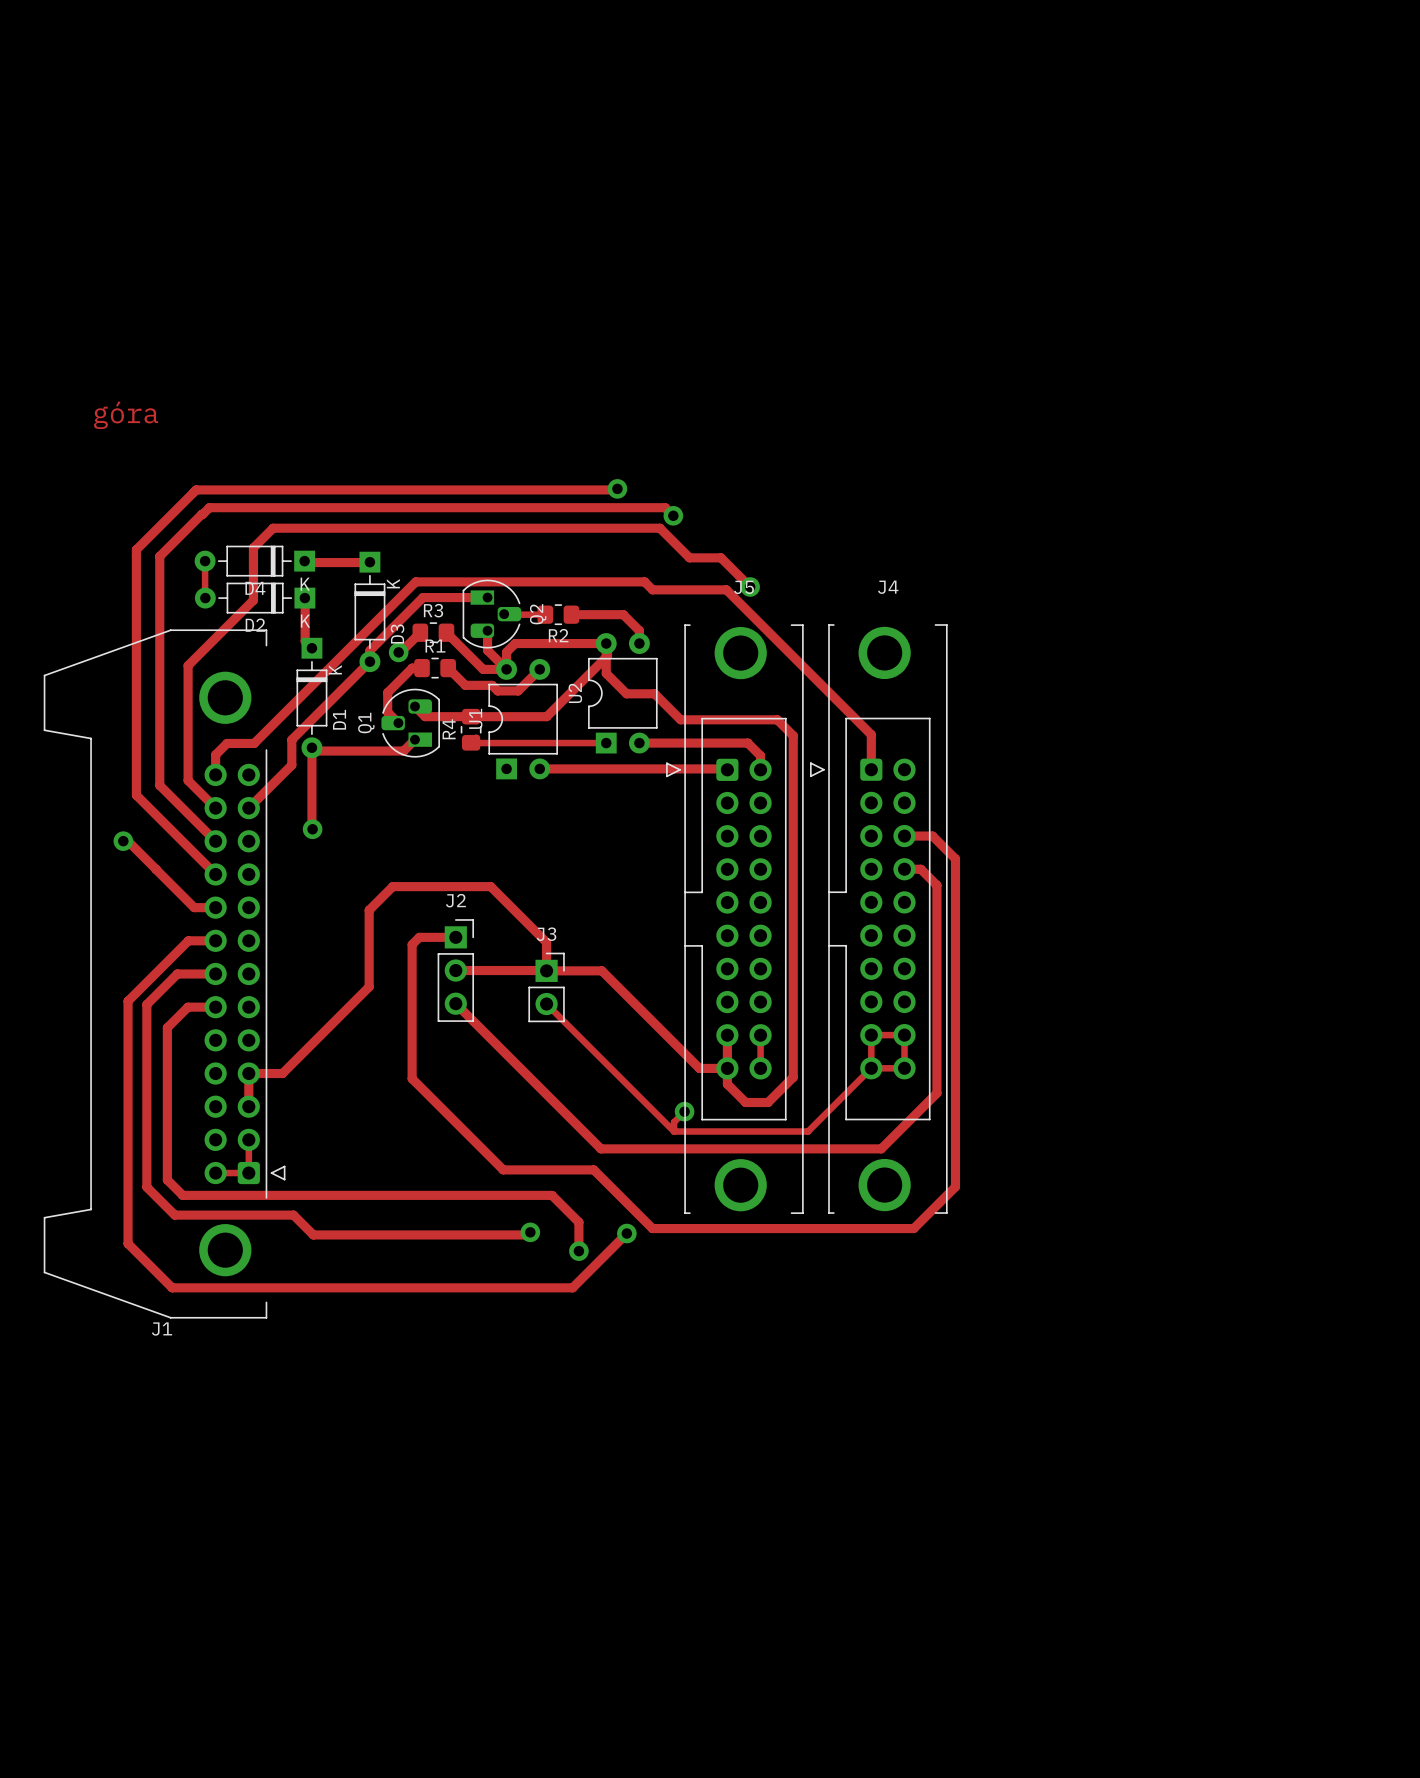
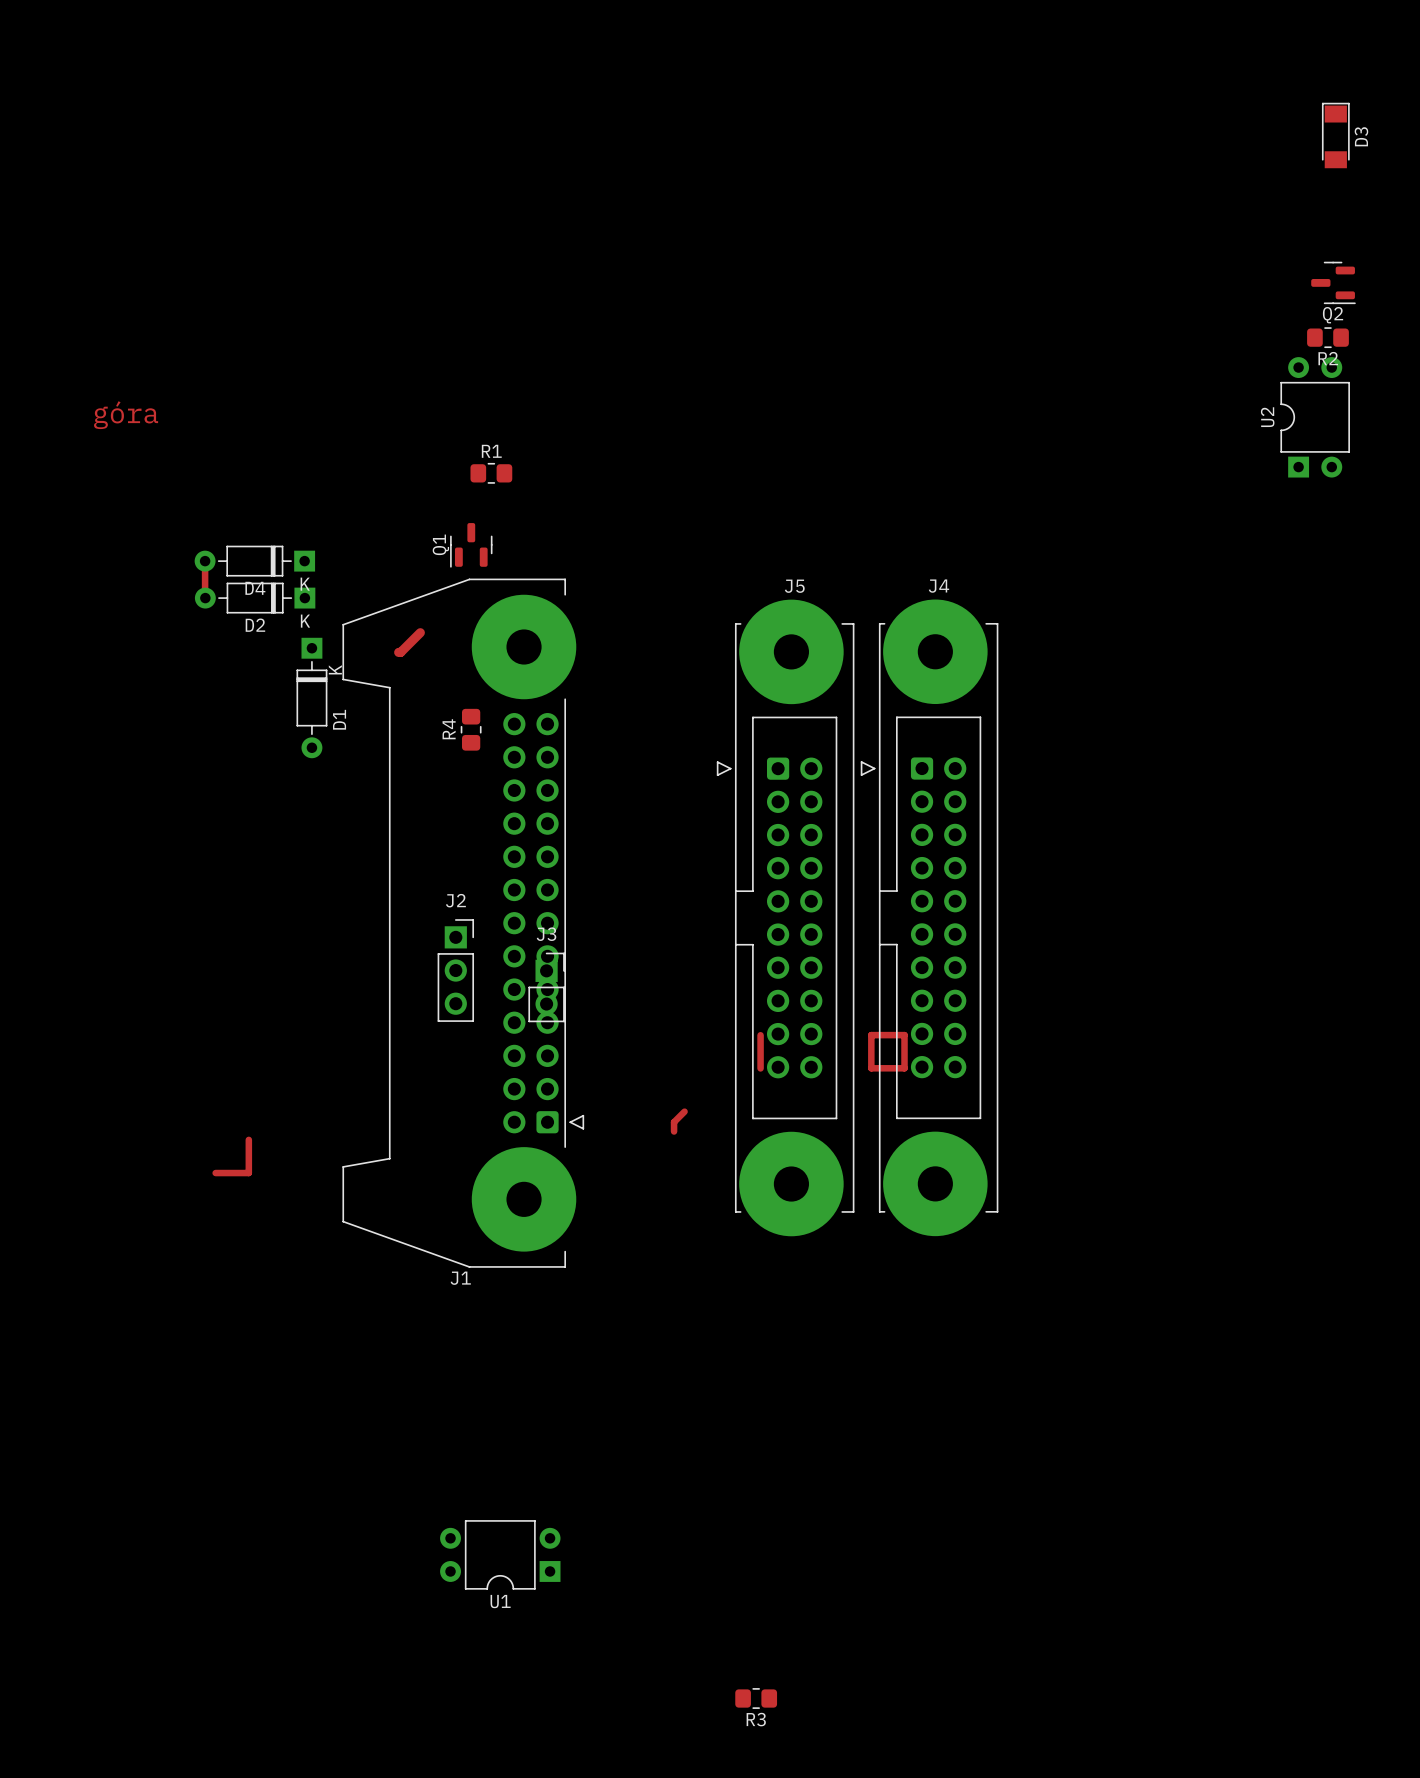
via: (617, 488) -> none
track: (618, 489) (196, 489) (136, 549) (136, 795) (215, 874) -> none
track: (673, 515) (665, 507) (209, 507) (159, 556) (159, 785) (215, 841) -> none
via: (673, 515) -> none
D3 footprint: [354, 551, 386, 673] -> [1321, 102, 1350, 169]
track: (369, 562) (313, 562) -> none
Q2 footprint: [462, 579, 522, 649] -> [1311, 261, 1356, 305]
track: (750, 586) (721, 557) (689, 557) (659, 528) (273, 528) (253, 547) (253, 600) (188, 665) (188, 780) (215, 808) -> none
via: (750, 586) -> none
track: (305, 595) (305, 641) (311, 648) -> none
track: (487, 597) (422, 597) (369, 650) (369, 661) (291, 739) (291, 765) (248, 808) -> none
R3 name position: R3 (433, 610) -> R3 (756, 1719)
Q2 name position: Q2 (538, 614) -> Q2 (1333, 315)
R2 position: (558, 614) -> (1327, 337)
track: (571, 614) (623, 614) (639, 630) (639, 643) -> none
J5 footprint: [666, 624, 804, 1214] -> [716, 599, 855, 1237]
J4 footprint: [810, 624, 948, 1214] -> [860, 599, 999, 1237]
J1 footprint: [43, 629, 286, 1319] -> [342, 578, 585, 1268]
track: (487, 630) (487, 650) (506, 669) -> none
R3 position: (433, 632) -> (756, 1698)
track: (446, 632) (483, 669) (506, 669) -> none
track: (606, 643) (515, 643) (506, 652) (506, 669) -> none
track: (606, 643) (606, 673) (626, 693) (654, 693) (680, 719) (777, 719) (793, 735) (793, 1077) (768, 1102) (745, 1102) (727, 1084) (727, 1035) -> none
track: (606, 643) (607, 655) (546, 716) (425, 716) (414, 706) -> none
via: (398, 652) -> none
track: (422, 668) (412, 668) (387, 692) (387, 712) (398, 723) -> none
R1 position: (435, 668) -> (491, 473)
track: (448, 668) (465, 685) (492, 685) (497, 690) (518, 690) (539, 669) -> none
Q1 footprint: [381, 688, 440, 758] -> [450, 523, 493, 568]
U2 position: (622, 693) -> (1315, 417)
U1 rotation: 0° (523, 719) -> 90° counterclockwise (500, 1554)
U1 position: (523, 719) -> (500, 1554)
track: (476, 737) (471, 743) (606, 743) (600, 737) -> none
track: (414, 739) (403, 751) (315, 751) (311, 747) (312, 829) -> none
track: (639, 743) (747, 743) (760, 755) (760, 769) -> none
track: (539, 768) (727, 769) -> none
track: (871, 769) (871, 734) (726, 589) (652, 589) (644, 581) (415, 581) (254, 743) (227, 743) (215, 754) (215, 774) -> none
via: (312, 829) -> none
track: (904, 836) (932, 836) (955, 858) (955, 1186) (913, 1228) (652, 1228) (593, 1169) (503, 1169) (412, 1078) (412, 944) (419, 937) (455, 937) -> none
track: (123, 841) (127, 841) (155, 869) -> none
via: (123, 841) -> none
track: (155, 869) (194, 907) (215, 907) -> none
track: (902, 869) (920, 869) (936, 885) (936, 1093) (881, 1148) (600, 1148) (455, 1003) -> none
track: (215, 940) (188, 940) (128, 1001) (128, 1243) (172, 1287) (572, 1287) (626, 1233) -> none
track: (455, 970) (546, 970) -> none
track: (546, 970) (546, 942) (490, 886) (392, 886) (369, 910) (369, 986) (282, 1073) (248, 1073) (248, 1106) -> none
track: (546, 970) (601, 970) (699, 1068) (727, 1068) -> none
track: (215, 973) (177, 973) (146, 1004) (146, 1187) (174, 1215) (293, 1215) (313, 1234) (527, 1234) (530, 1232) -> none
track: (546, 1004) (674, 1131) (808, 1131) (871, 1068) -> none
track: (215, 1007) (187, 1007) (167, 1027) (167, 1179) (182, 1195) (552, 1195) (578, 1222) (578, 1251) -> none
via: (684, 1111) -> none
via: (530, 1232) -> none
via: (626, 1233) -> none
via: (578, 1251) -> none

